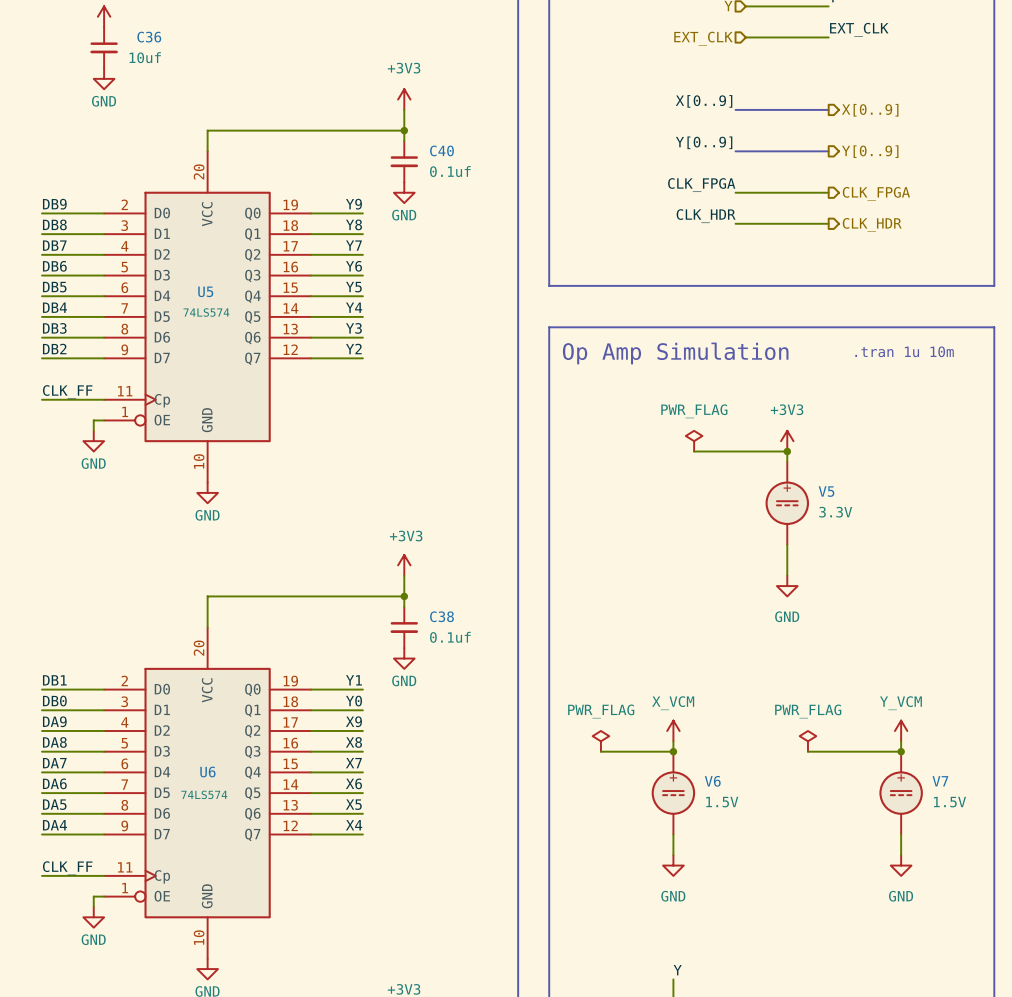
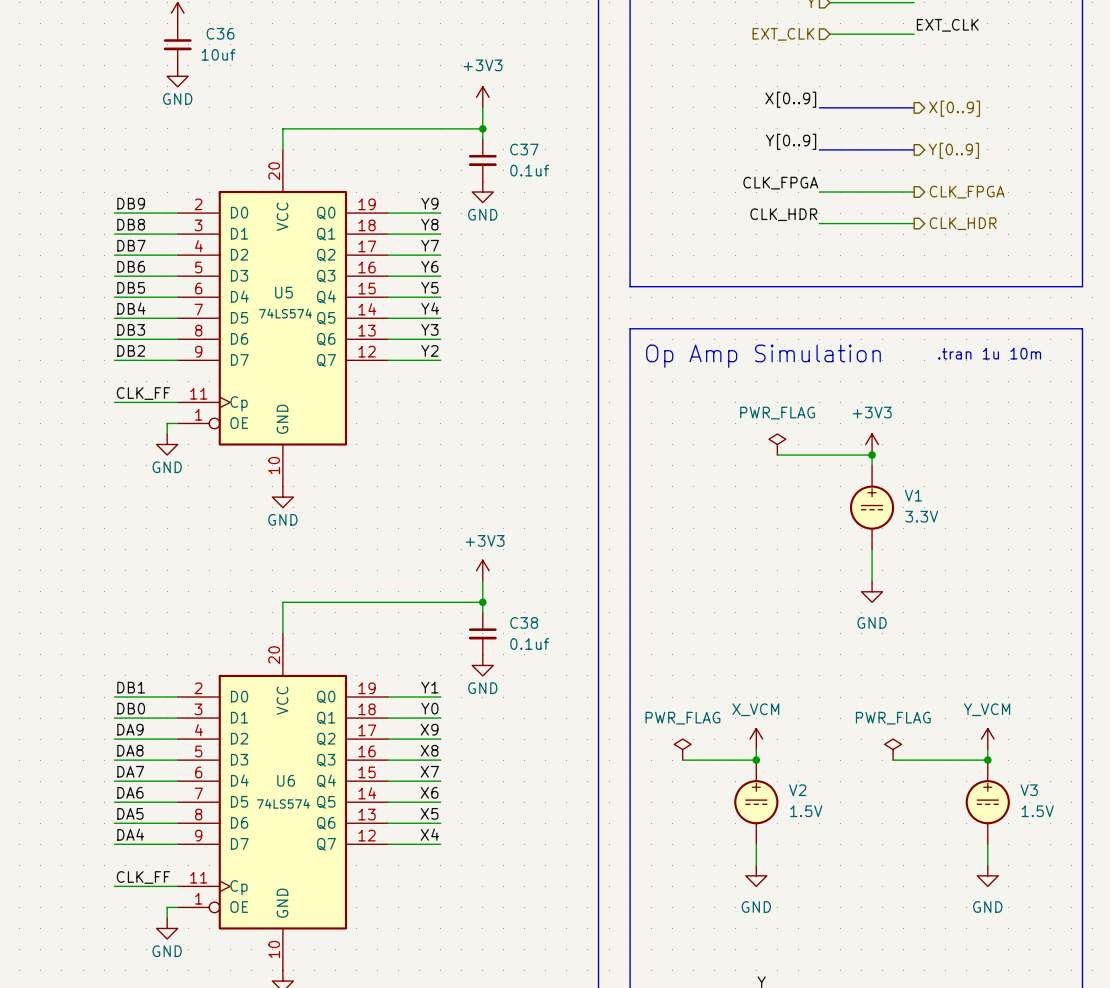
C40 name: C40 (441, 150) -> C37 (524, 149)
V5 name: V5 (826, 491) -> V1 (913, 495)
V6 name: V6 (712, 781) -> V2 (797, 790)
V7 name: V7 (940, 781) -> V3 (1029, 790)

